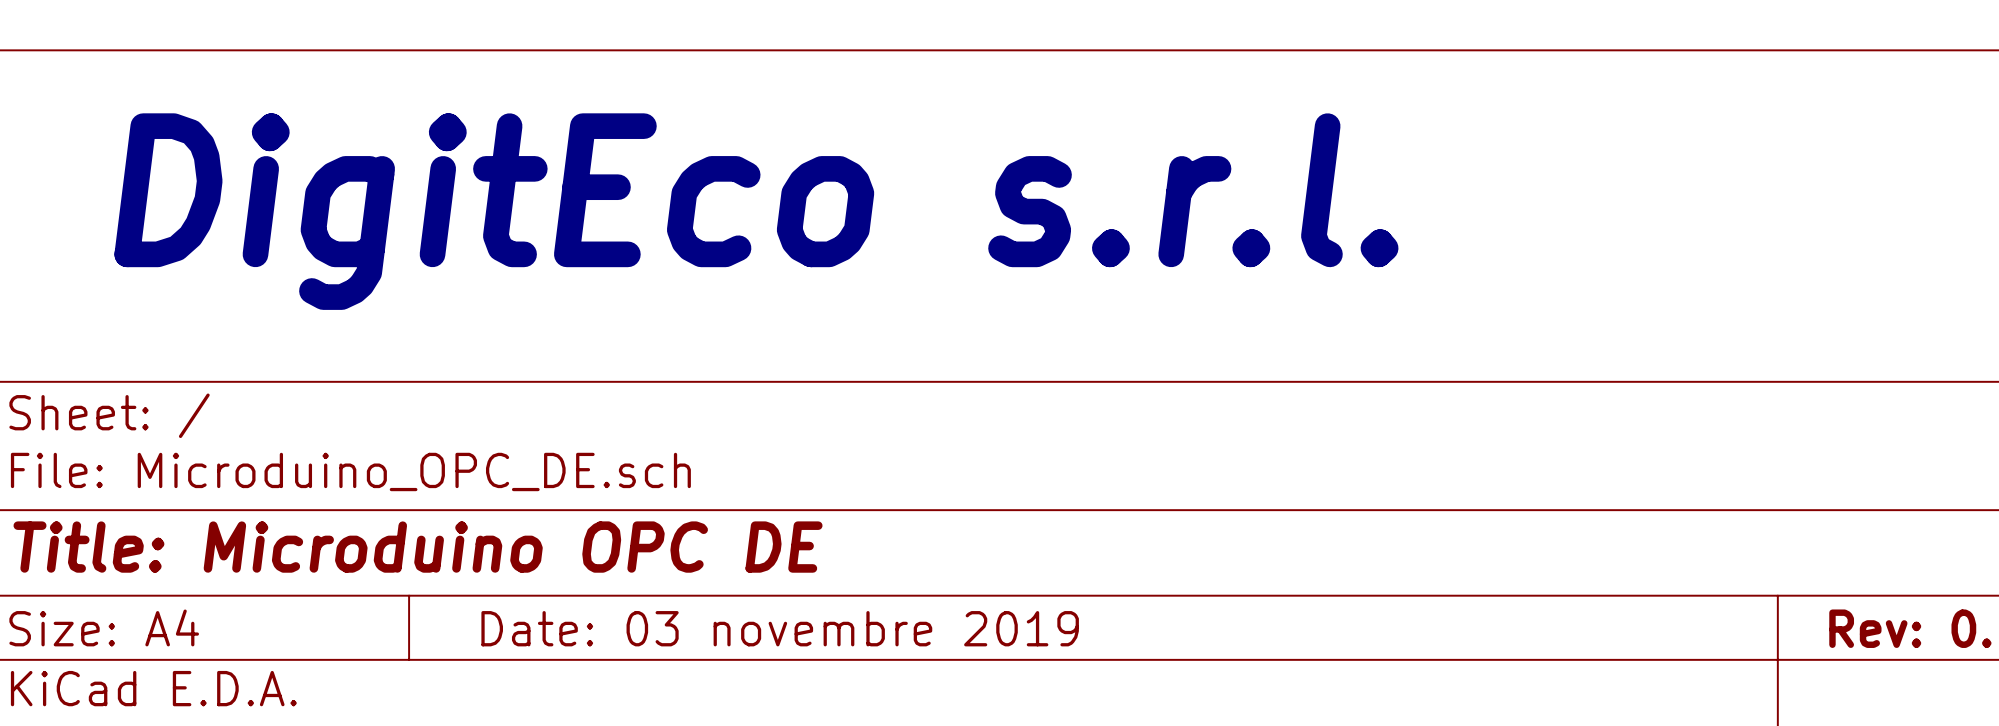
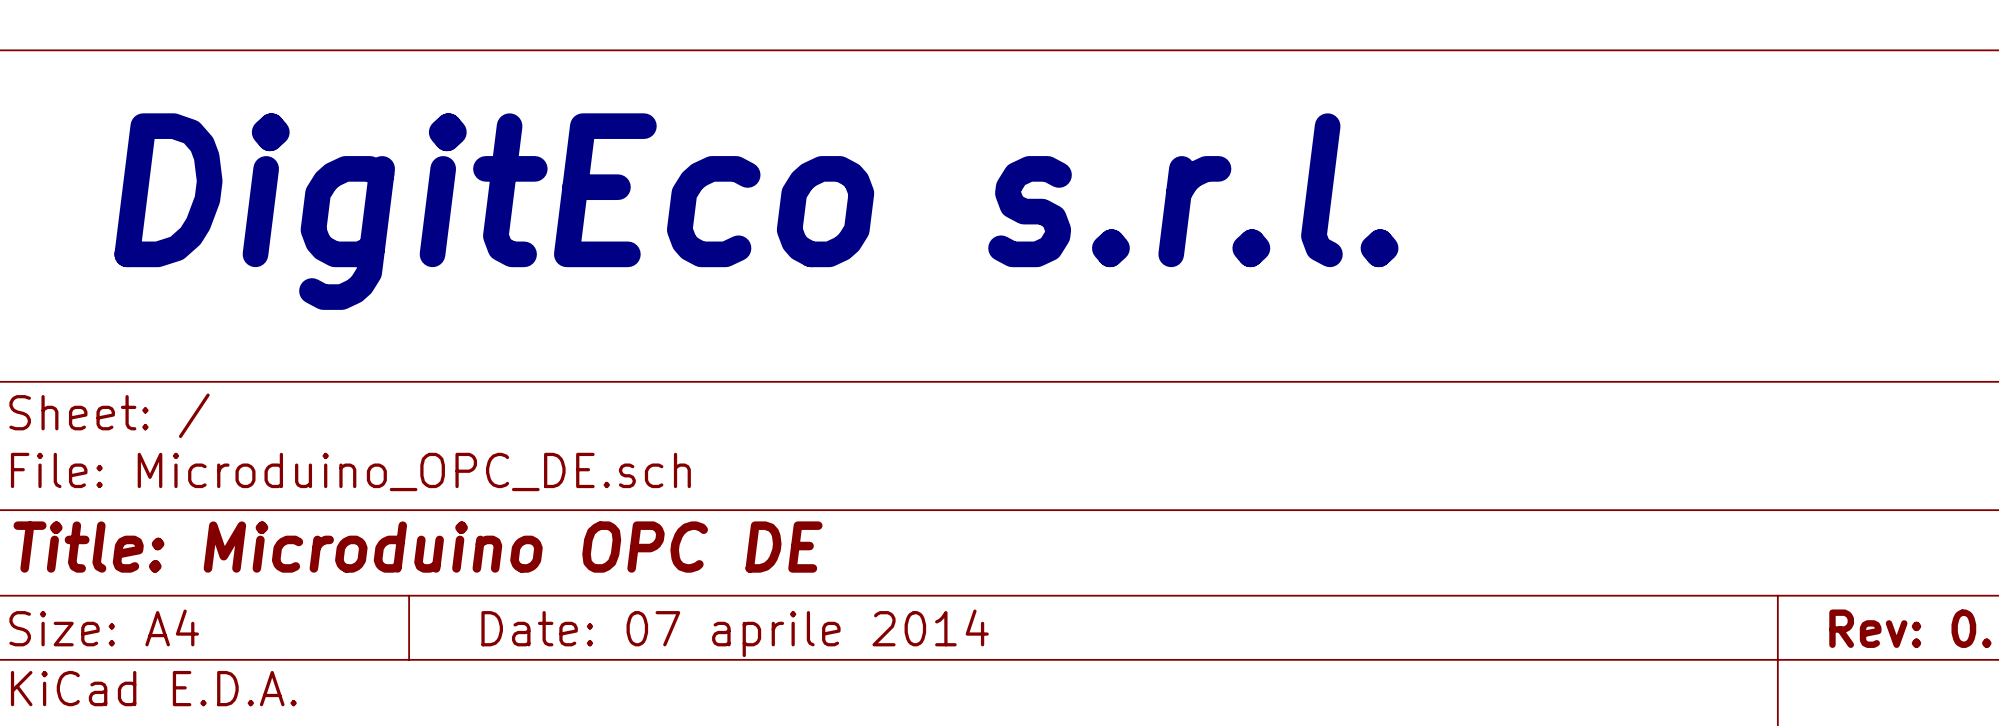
title block: Date: 03 novembre 2019 (780, 628) -> Date: 07 aprile 2014 (735, 633)

